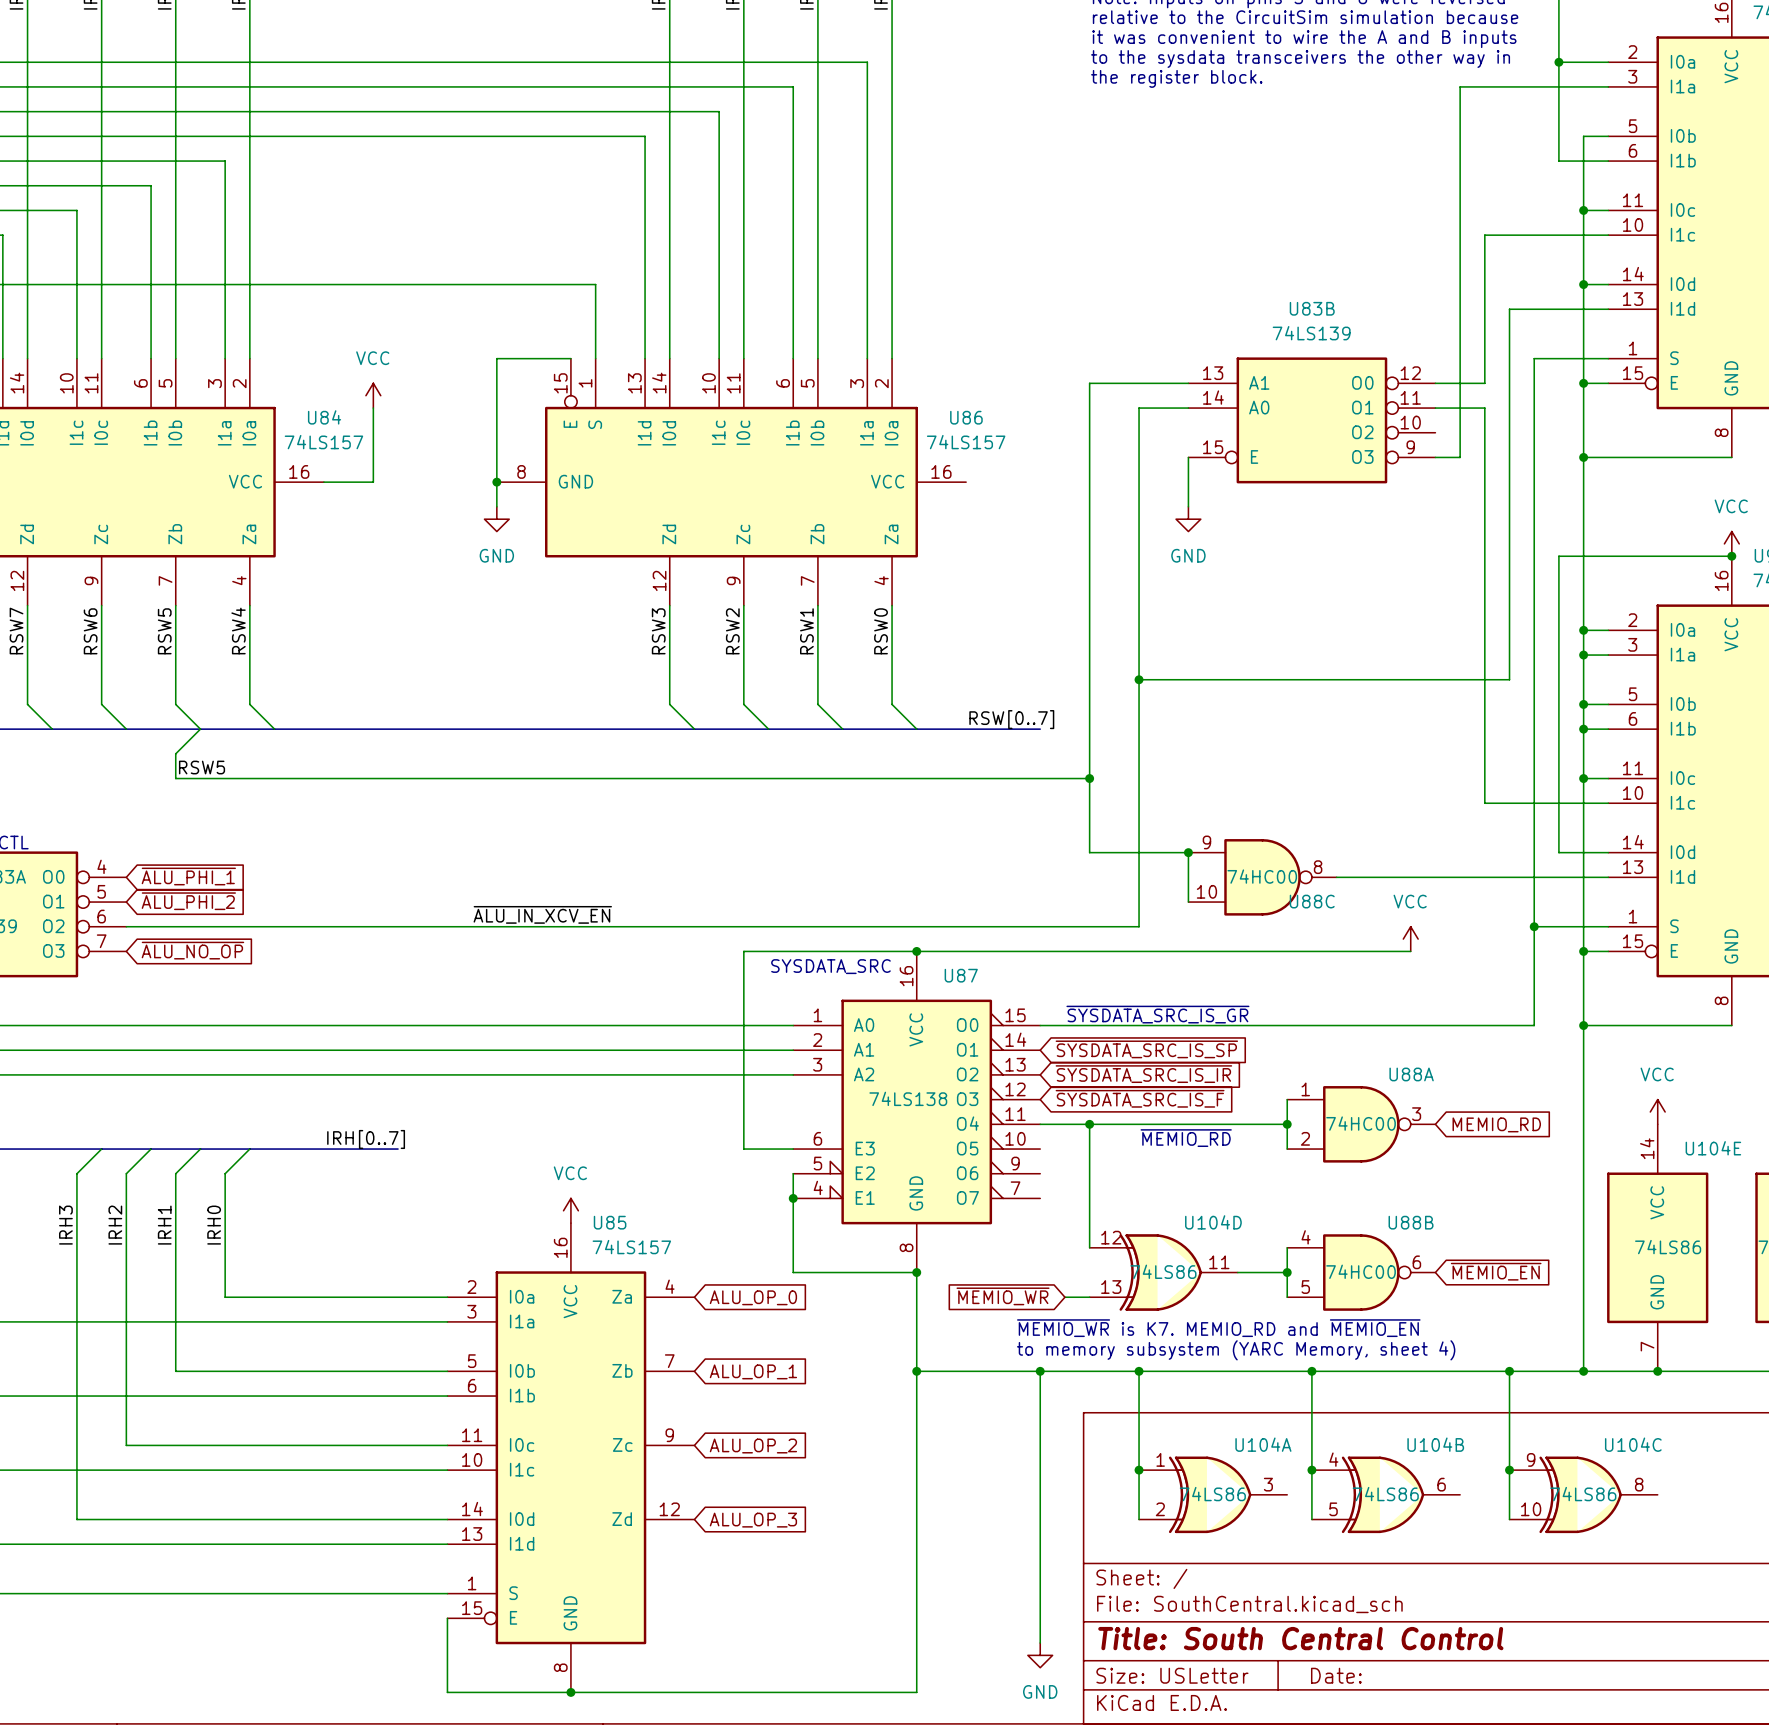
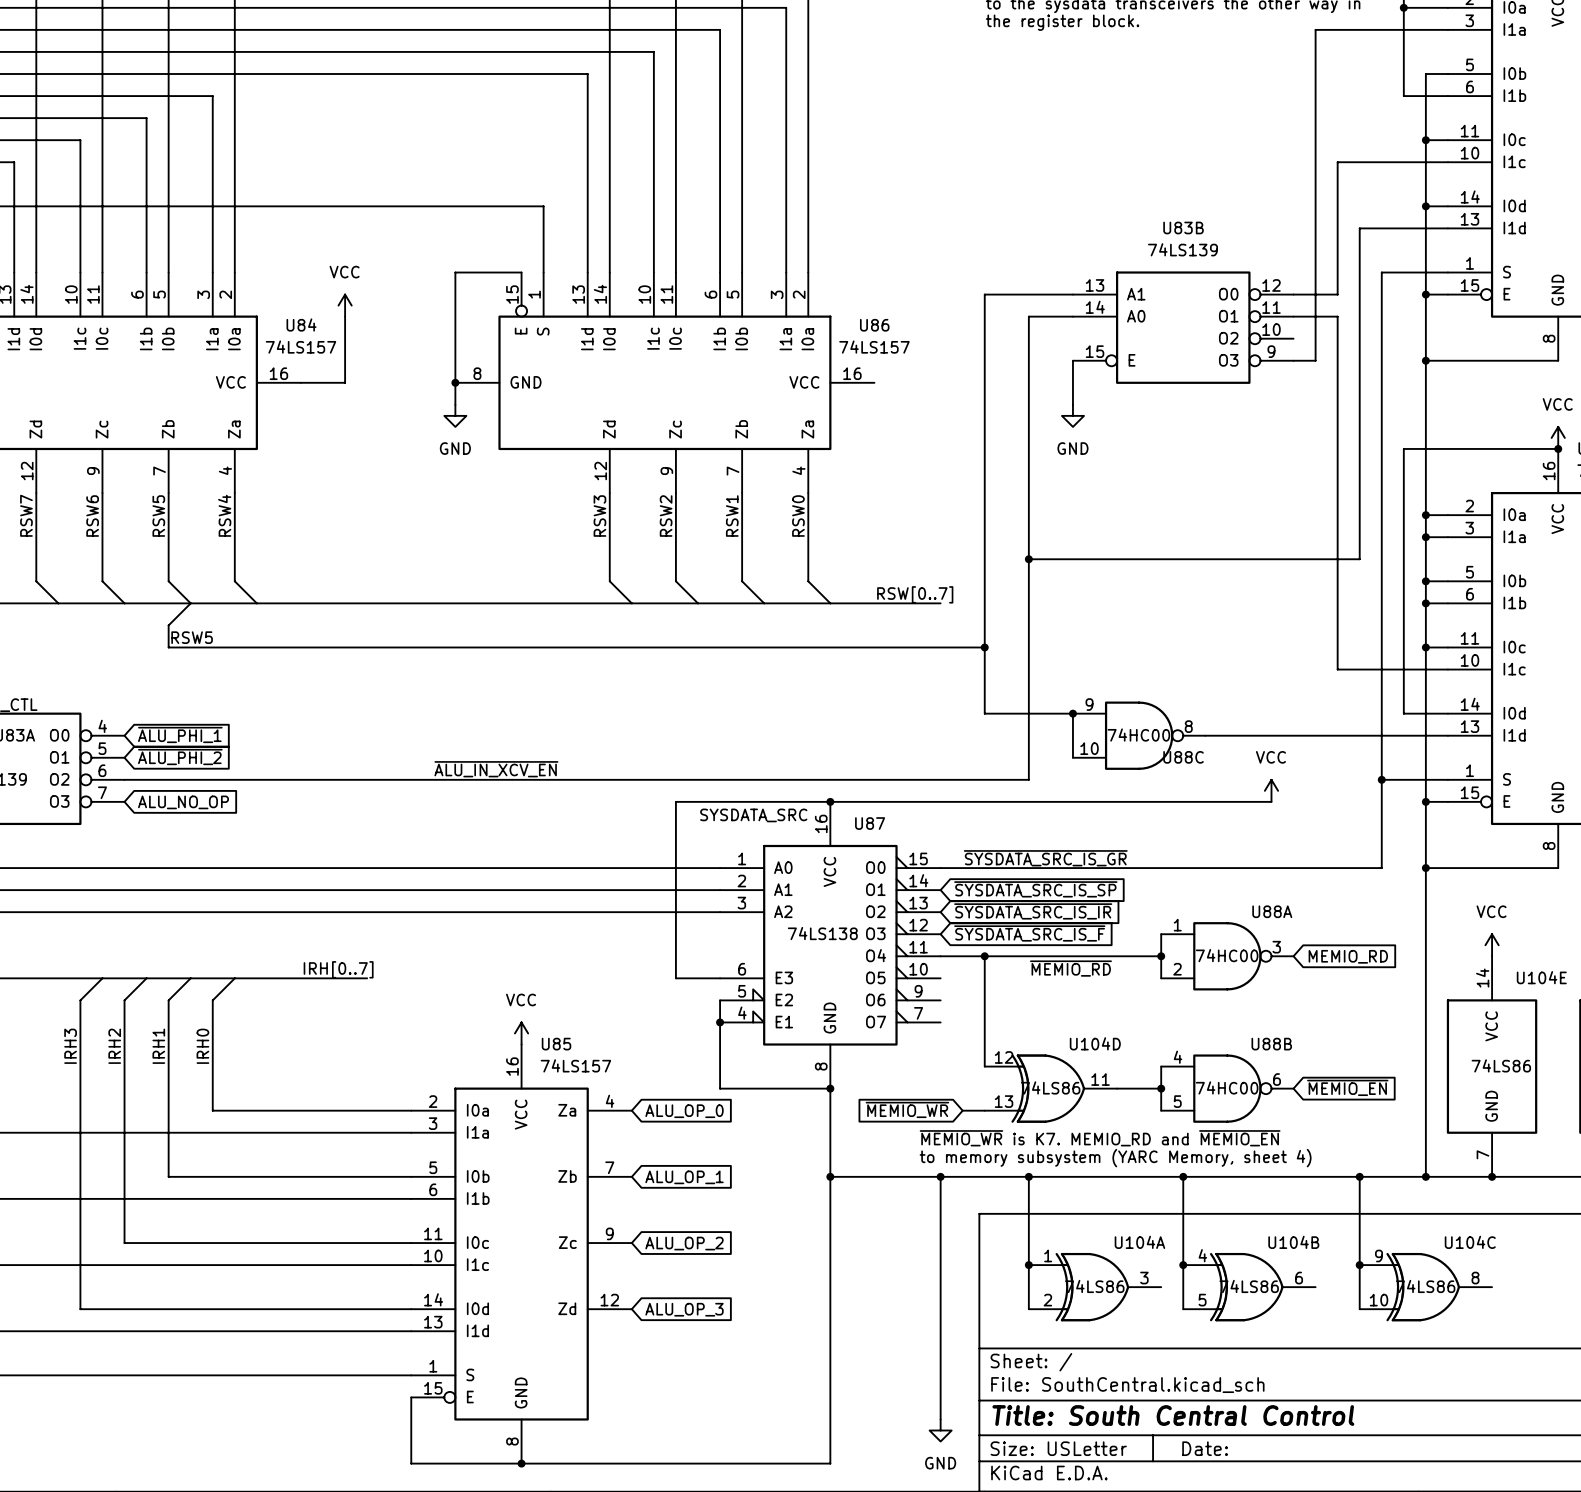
global label: ~{ALU_NO_OP} (192, 950) -> ALU_NO_OP (183, 802)

